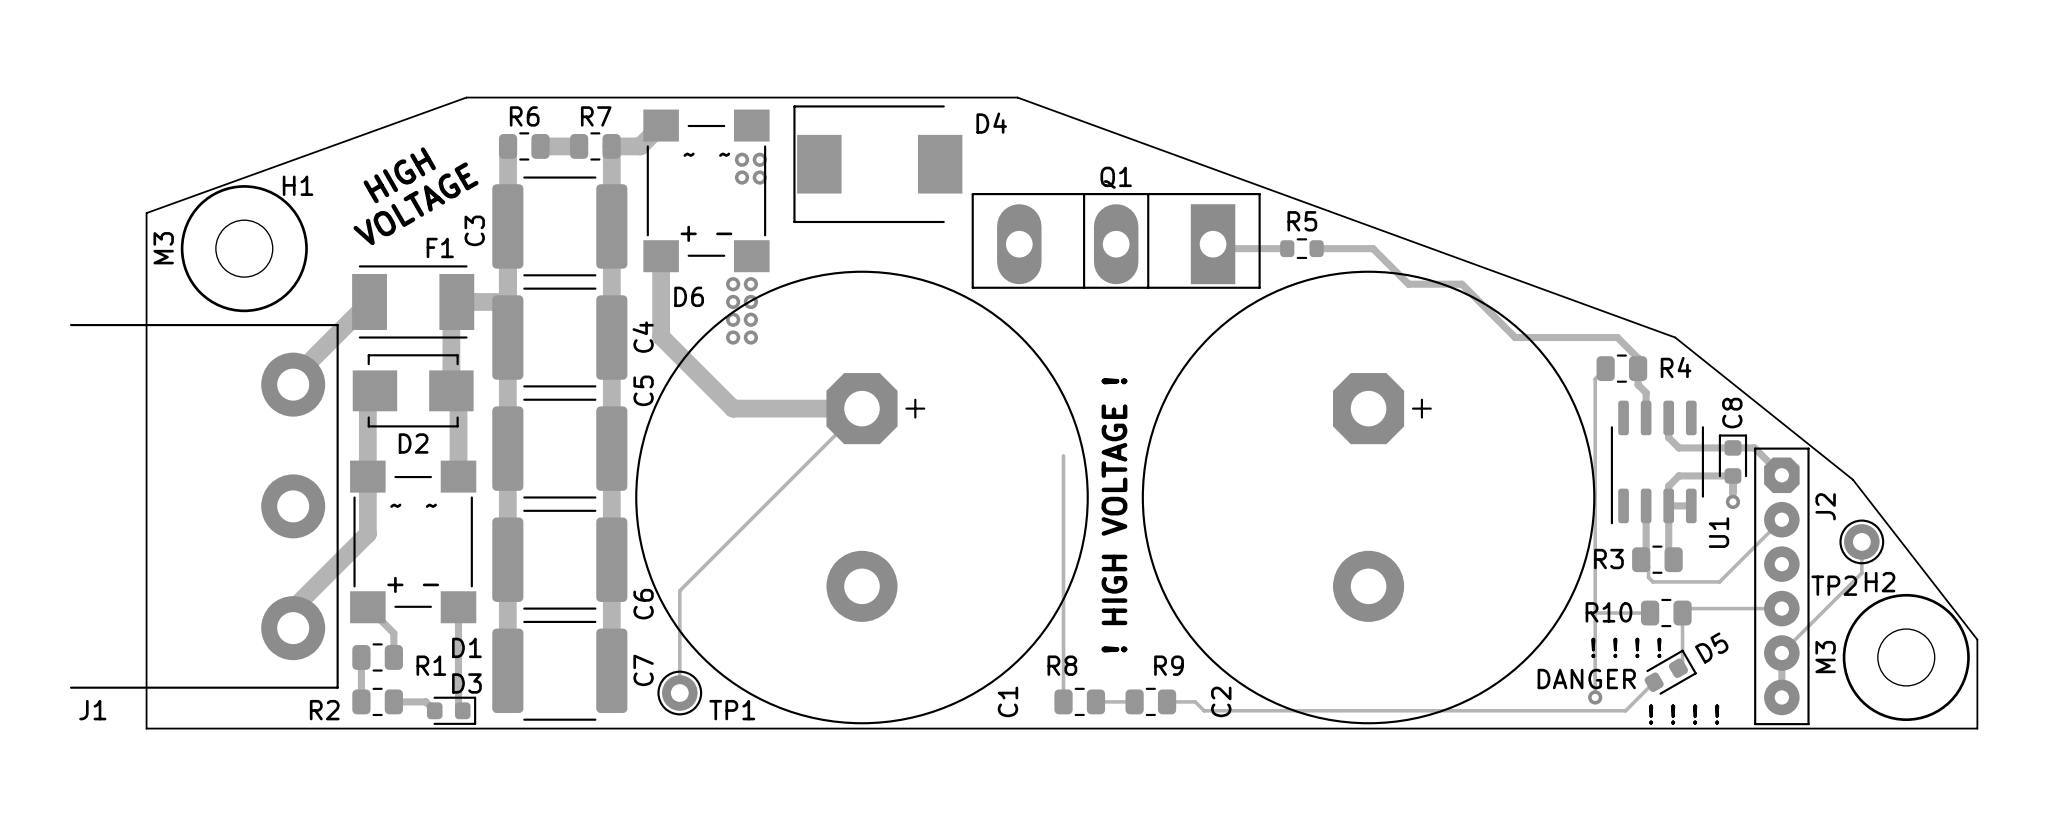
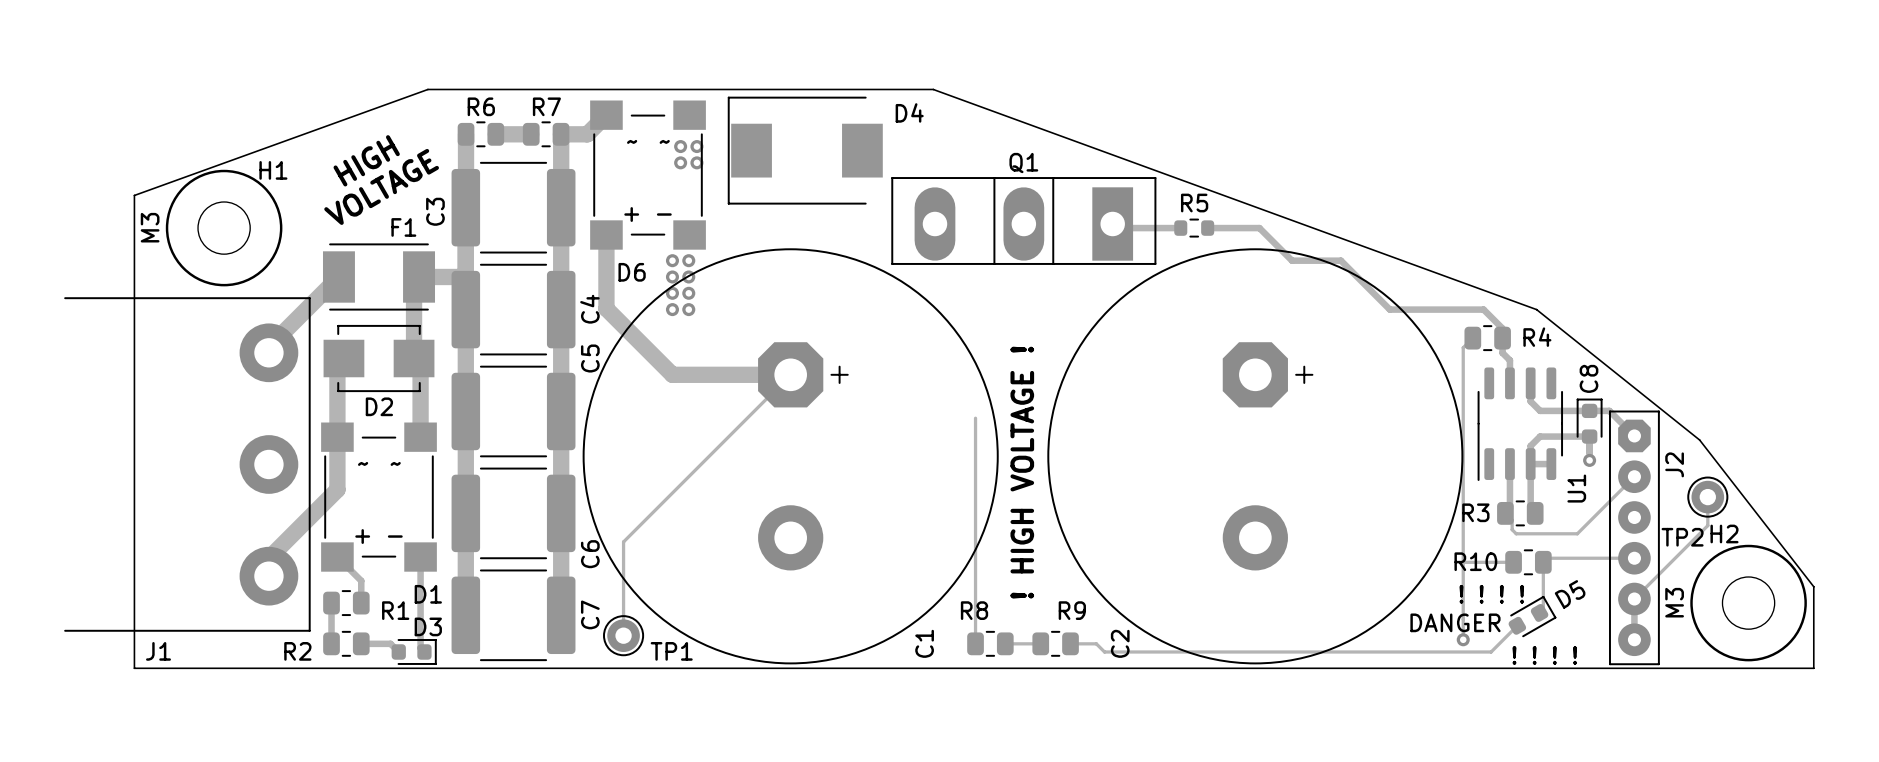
J1 name position: J1 (92, 710) -> J1 (158, 651)

